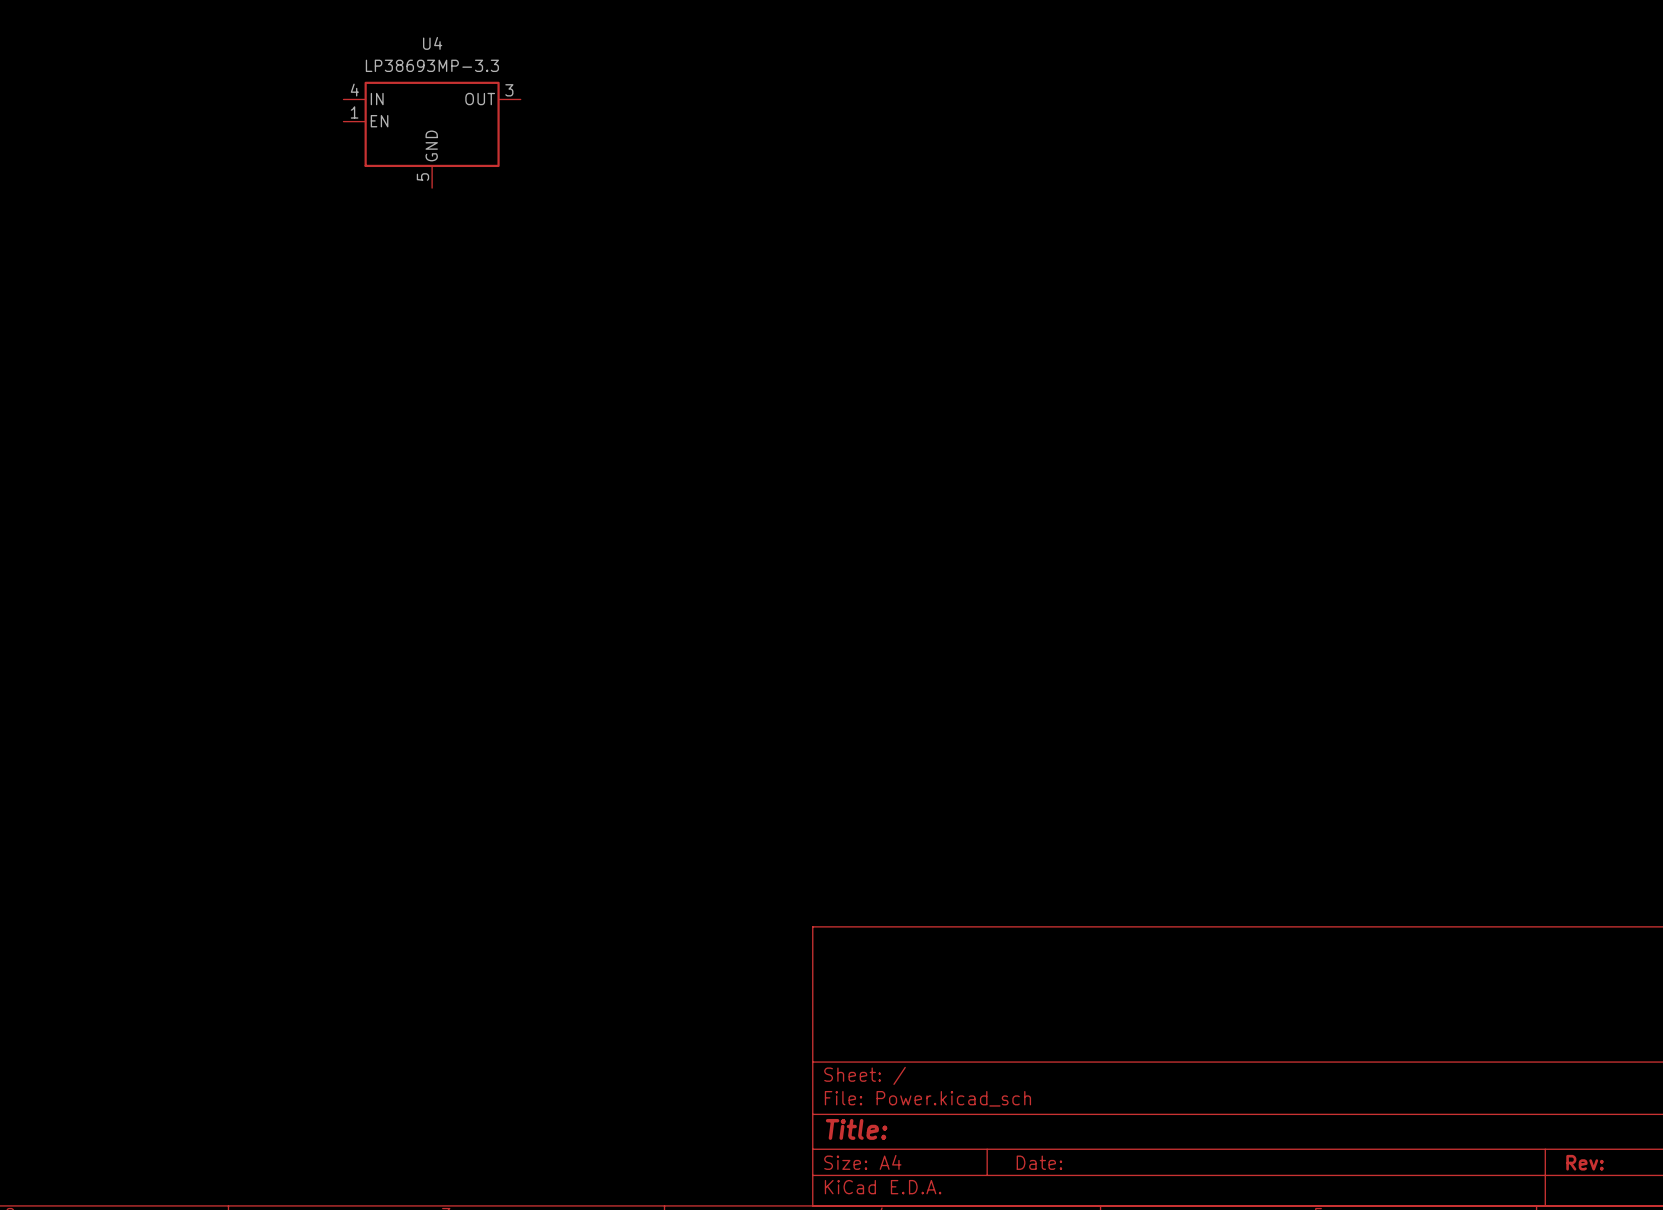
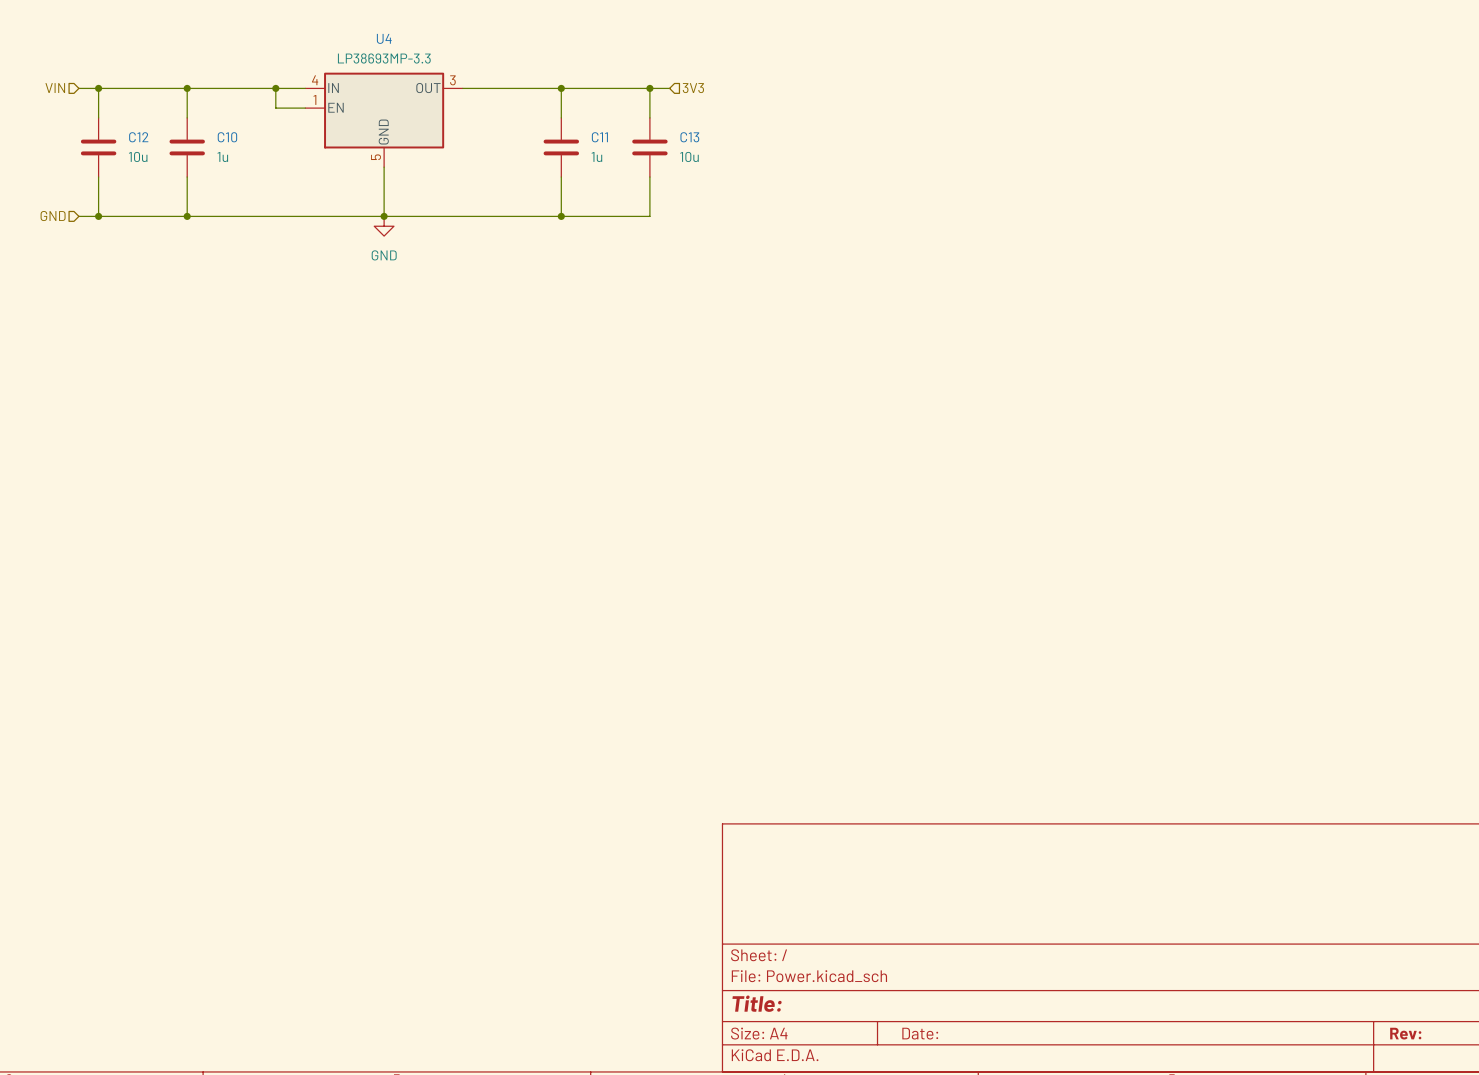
hierarchical label: none -> VIN (55, 88)
wire: none -> (78, 88) (305, 88)
wire: none -> (98, 88) (98, 117)
junction: none -> (98, 88)
wire: none -> (187, 88) (187, 117)
junction: none -> (187, 88)
wire: none -> (275, 88) (275, 108) (305, 108)
junction: none -> (275, 88)
wire: none -> (462, 88) (669, 88)
wire: none -> (561, 88) (561, 117)
junction: none -> (561, 88)
wire: none -> (649, 88) (649, 117)
junction: none -> (649, 88)
hierarchical label: none -> 3V3 (693, 88)
C12: none -> 10u (98, 147)
C10: none -> 1u (187, 147)
C11: none -> 1u (561, 147)
C13: none -> 10u (649, 147)
wire: none -> (384, 167) (384, 216)
wire: none -> (98, 177) (98, 216)
wire: none -> (187, 177) (187, 216)
wire: none -> (561, 177) (561, 216)
wire: none -> (649, 177) (649, 216) (78, 216)
hierarchical label: none -> GND (53, 216)
junction: none -> (98, 216)
junction: none -> (187, 216)
junction: none -> (384, 216)
junction: none -> (561, 216)
power symbol: none -> GND (384, 226)

